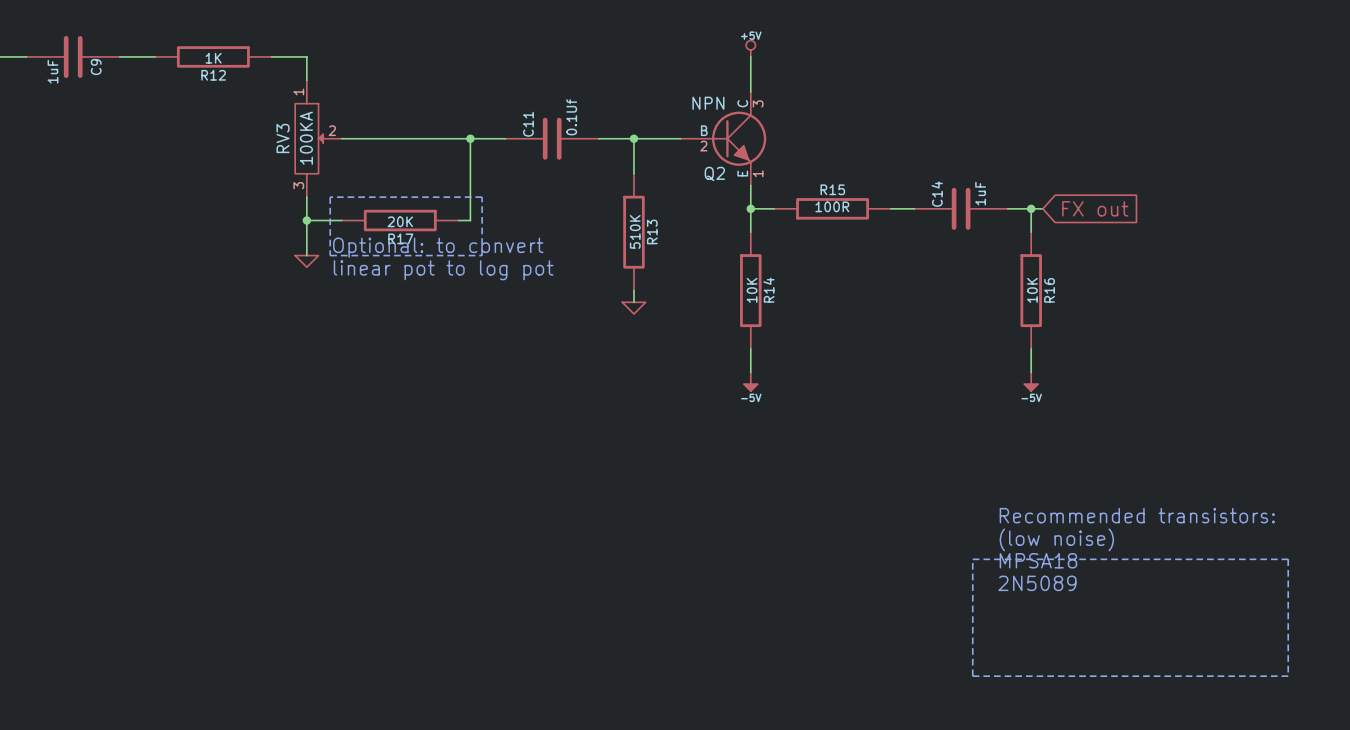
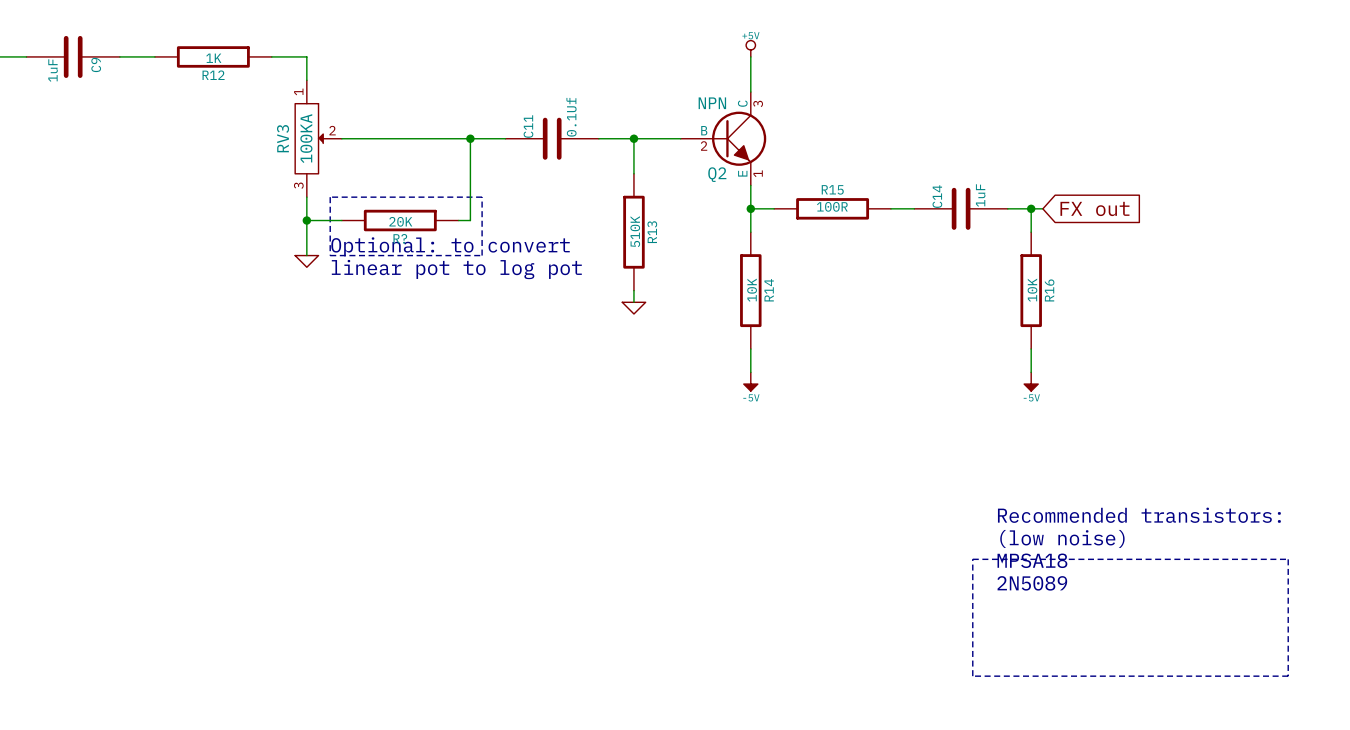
R17 name: R17 (400, 238) -> R? (400, 238)

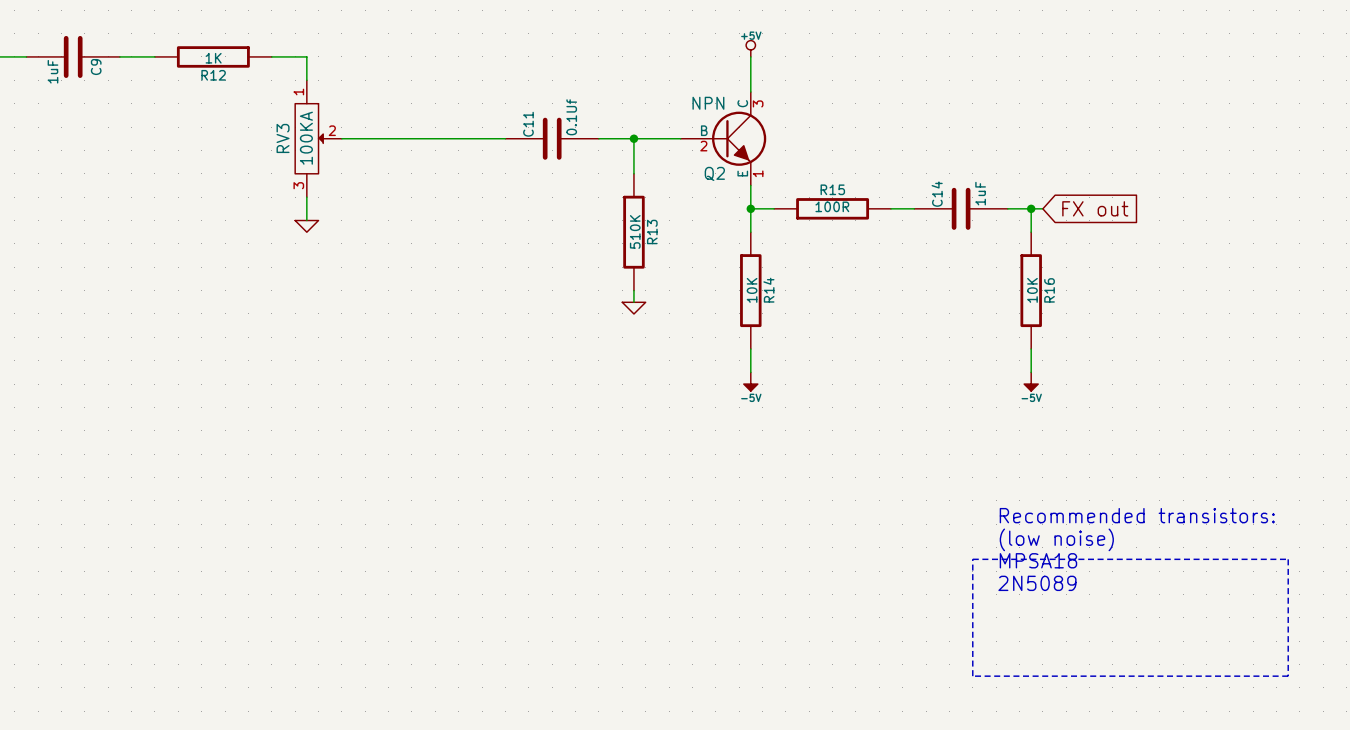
wire: (470, 138) (470, 220) (458, 220) -> none
junction: (470, 138) -> none
line: (330, 197) (330, 255) (482, 255) (482, 197) (330, 197) -> none
junction: (306, 220) -> none
wire: (341, 220) (306, 220) (306, 255) -> none
R?: 20K (400, 220) -> none
text: Optional: to convert (450, 246) -> none
power symbol position: (306, 261) -> (306, 226)
text: linear pot to log pot (456, 269) -> none

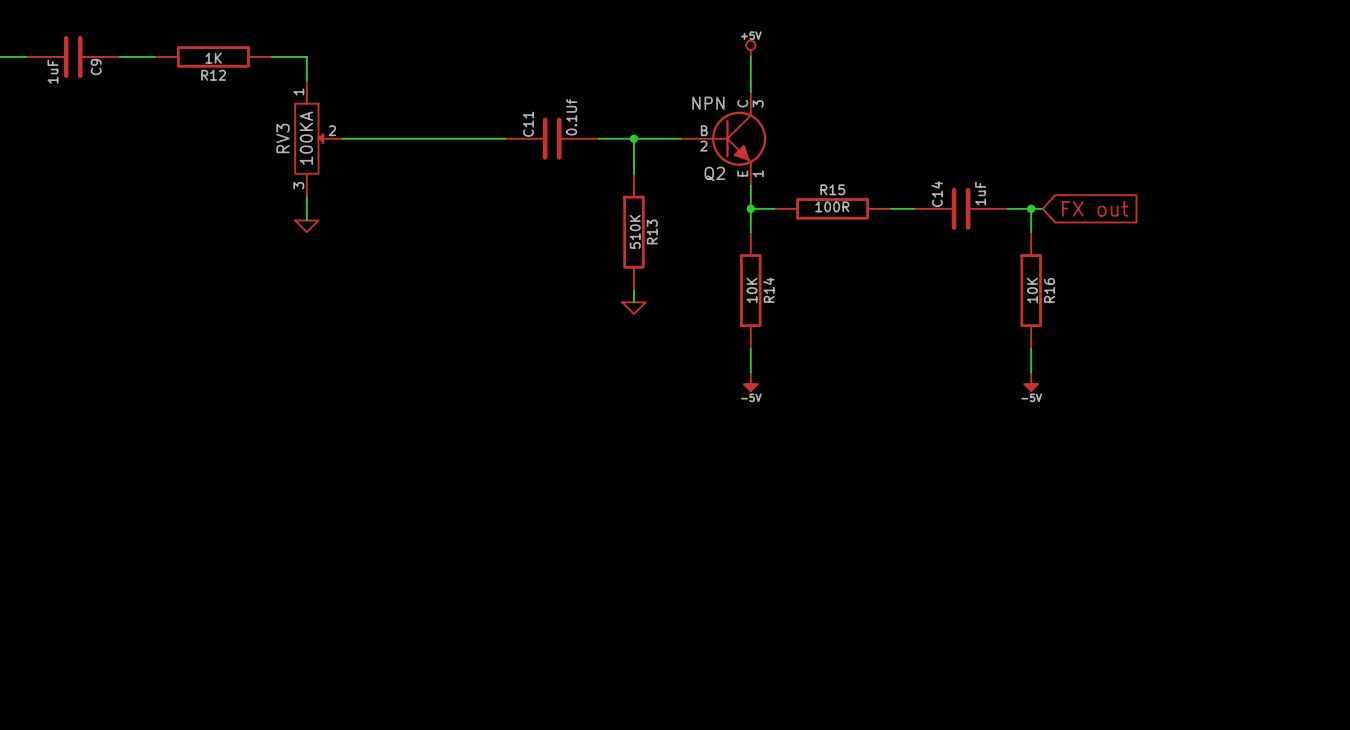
text: Recommended transistors: (1137, 515) -> none
text: (low noise) (1056, 539) -> none
line: (972, 559) (1288, 559) (1288, 676) (972, 676) (972, 559) -> none
text: MPSA18 (1038, 560) -> none
text: 2N5089 (1037, 583) -> none

